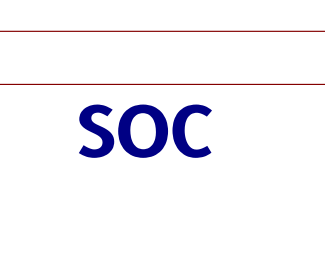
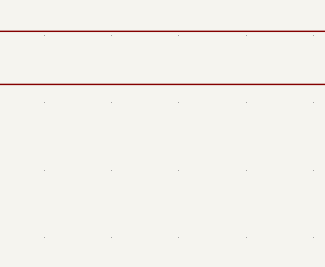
text: SOC (145, 131) -> none

